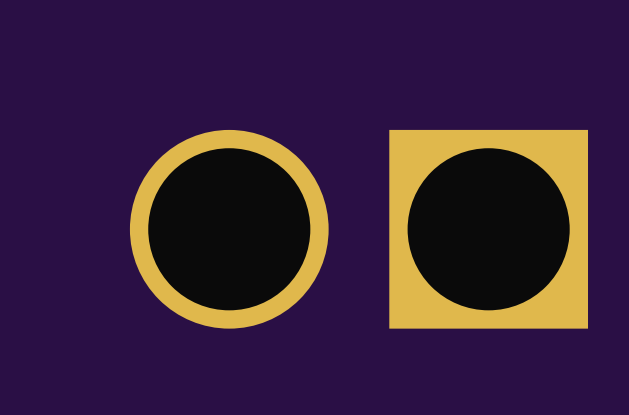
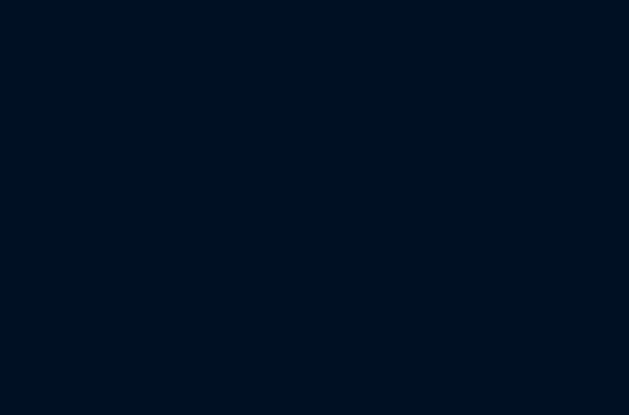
part: (358, 229) -> none

